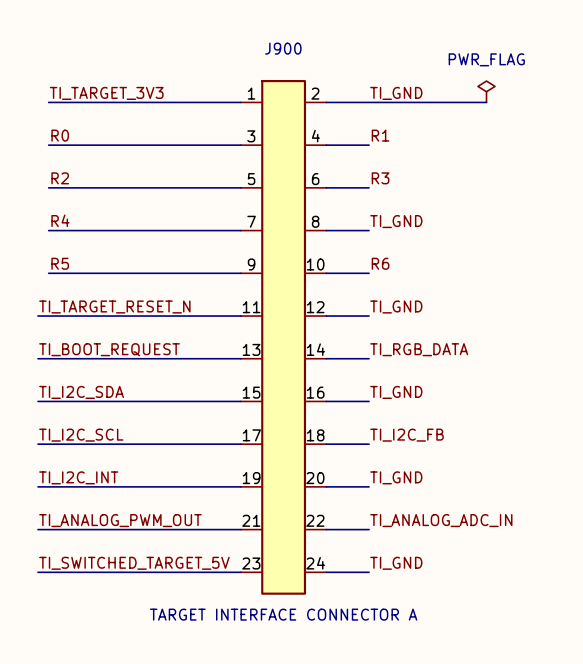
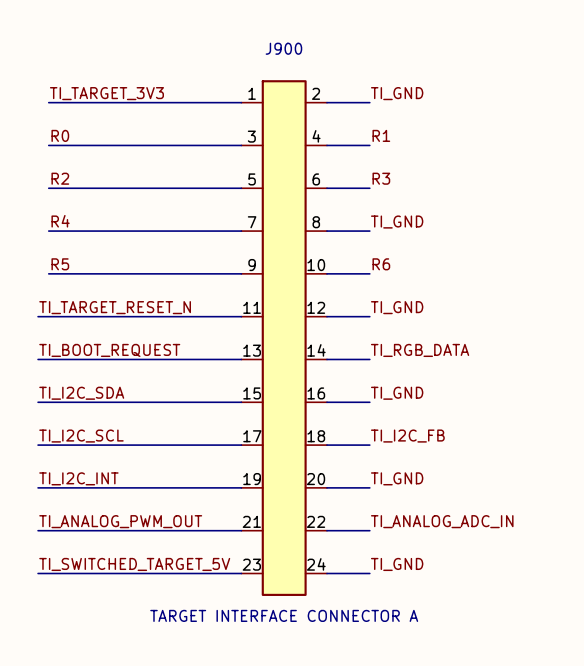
power symbol: PWR_FLAG (486, 91) -> none
wire: (369, 102) (486, 102) -> none

